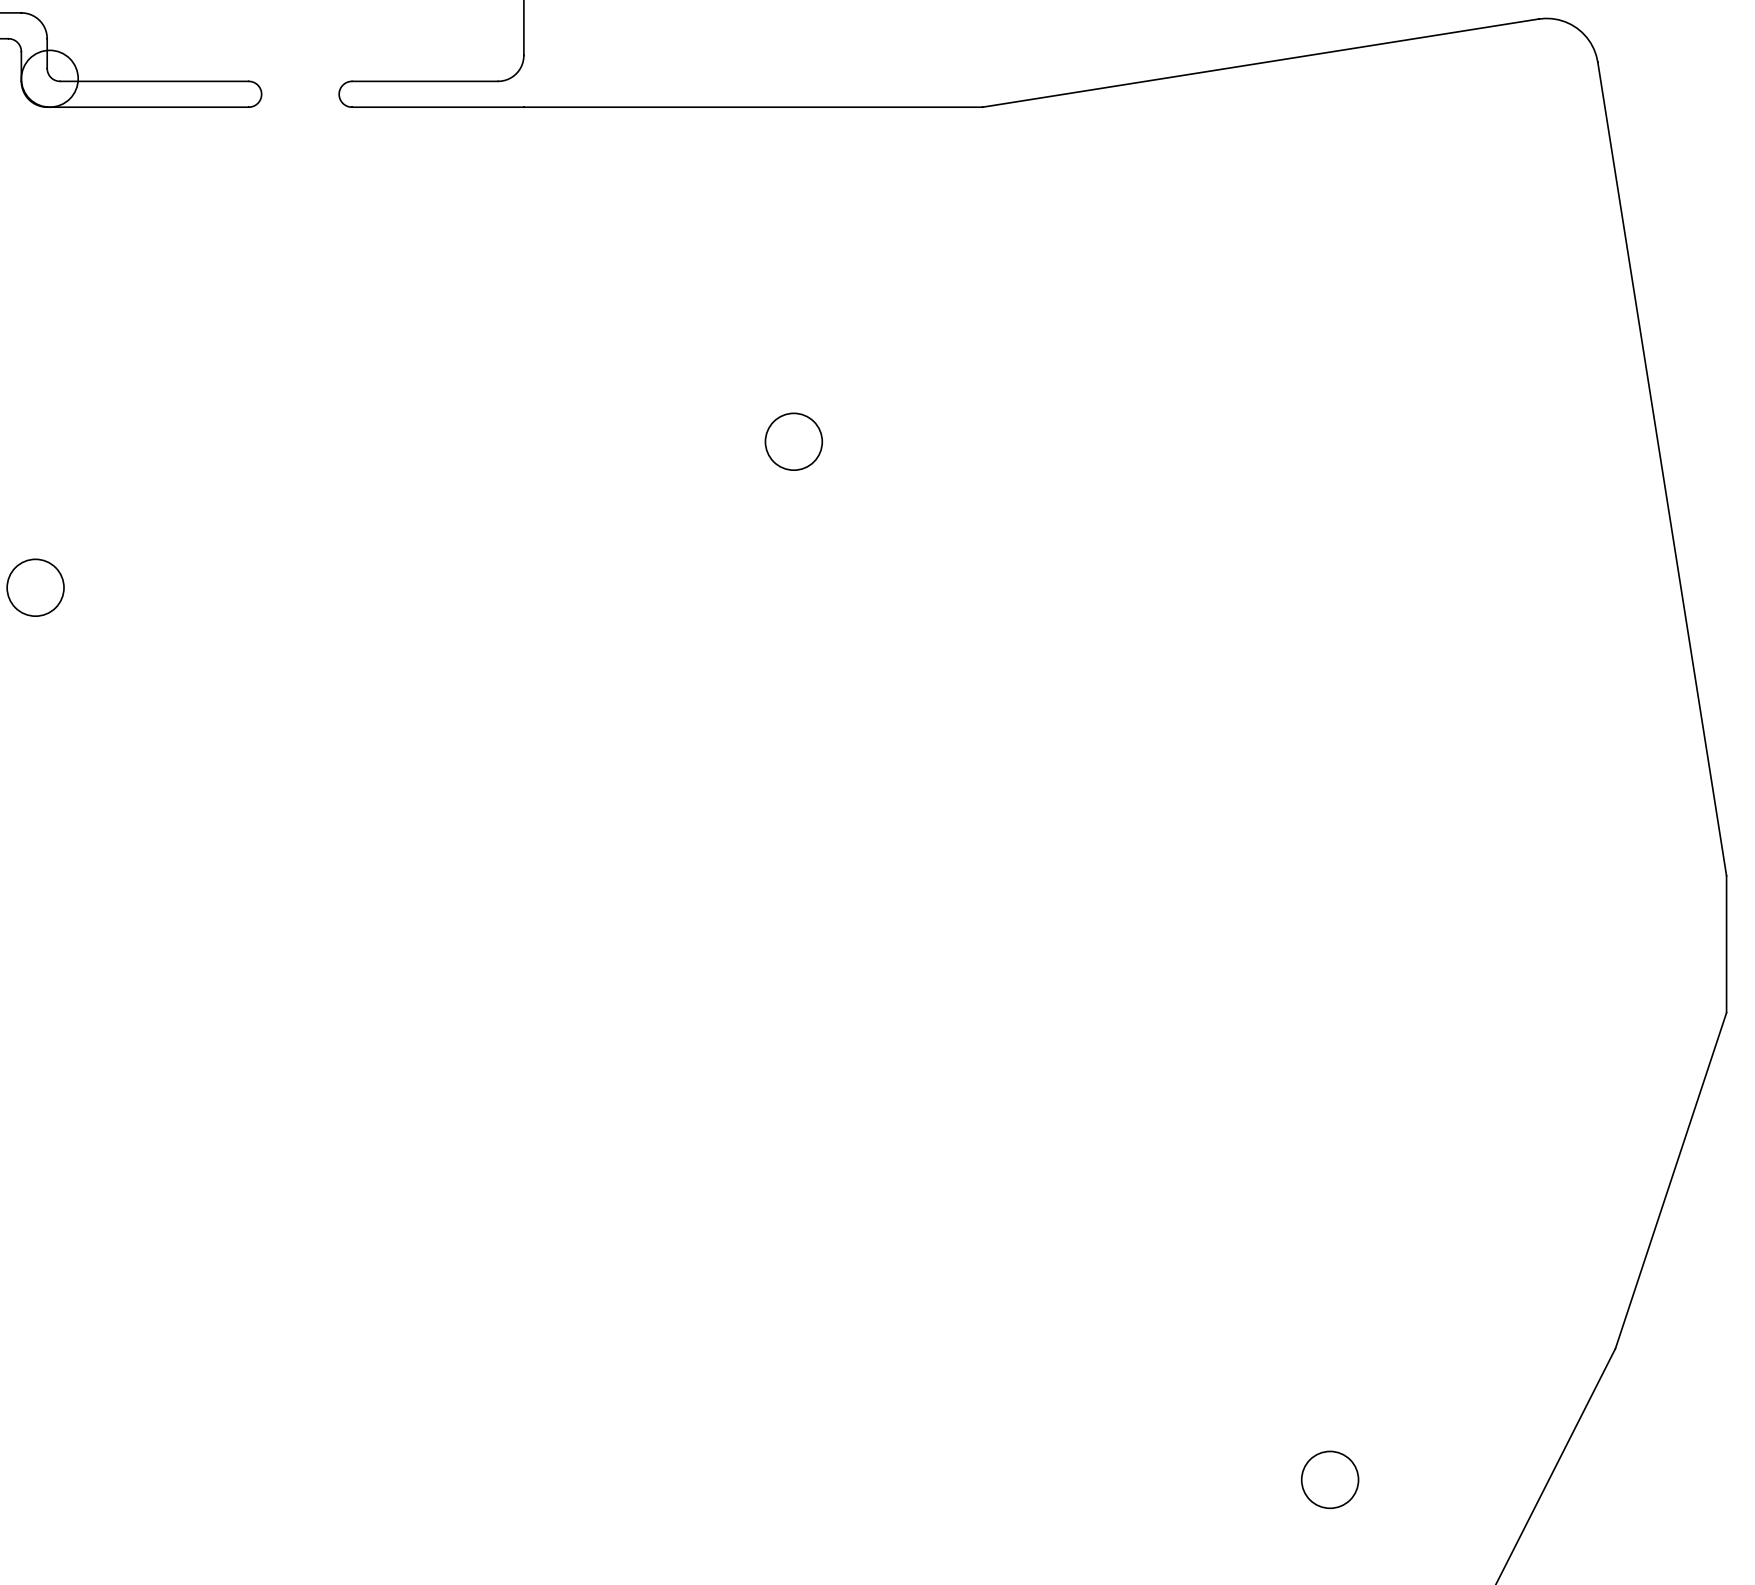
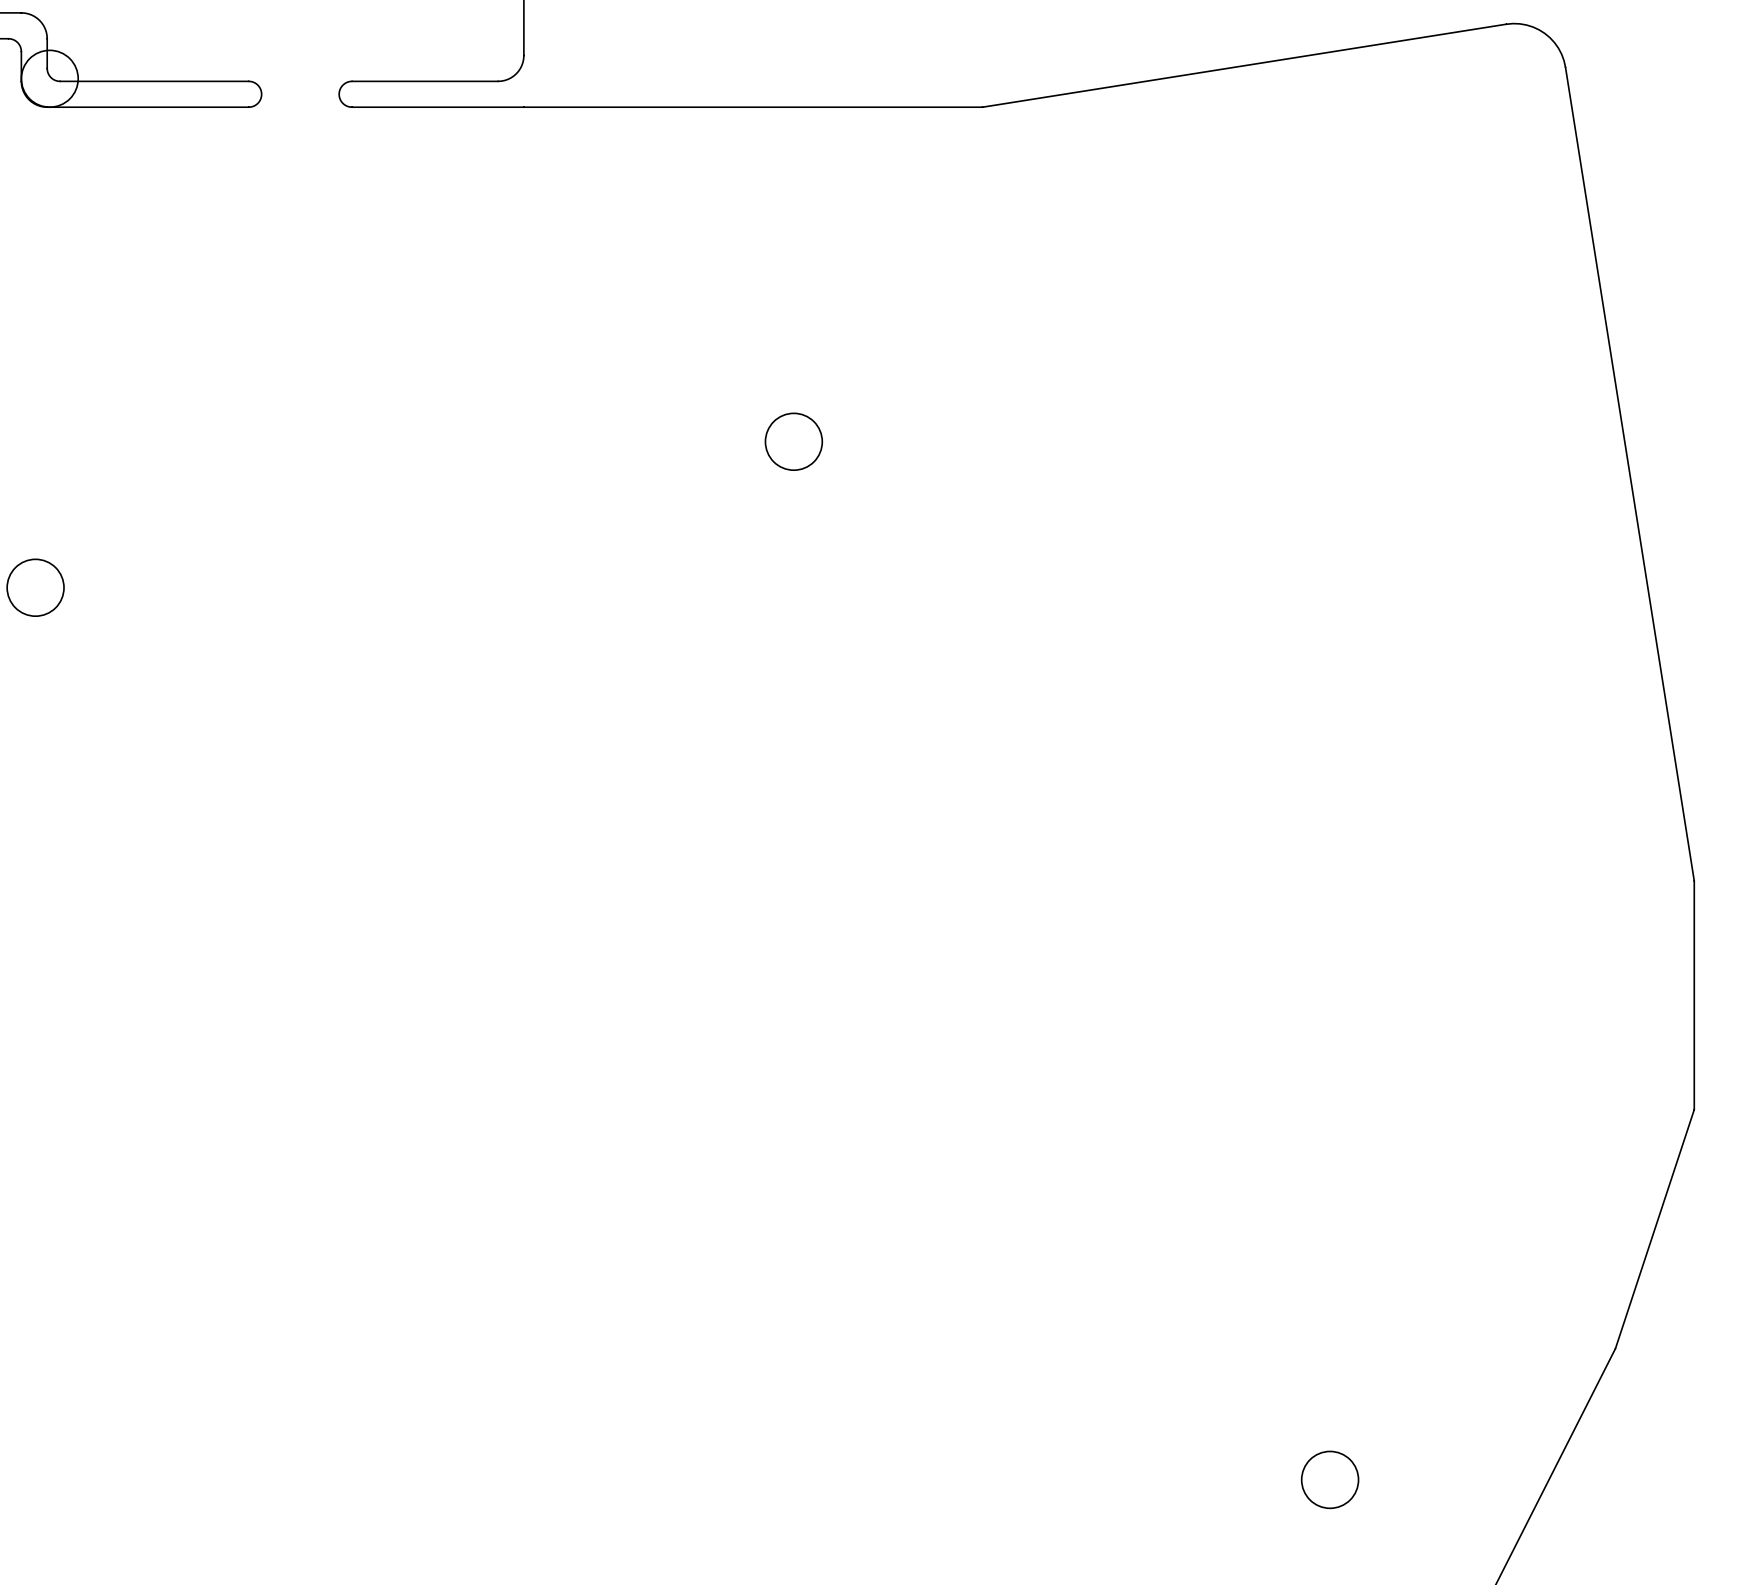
board edge: (982, 107) (1538, 19) (1558, 19) (1571, 24) (1586, 37) (1593, 49) (1597, 62) (1726, 875) (1726, 1012) (1615, 1348) -> (982, 107) (1513, 23) (1532, 27) (1544, 33) (1554, 42) (1561, 54) (1565, 67) (1694, 881) (1694, 1109) (1615, 1348)

